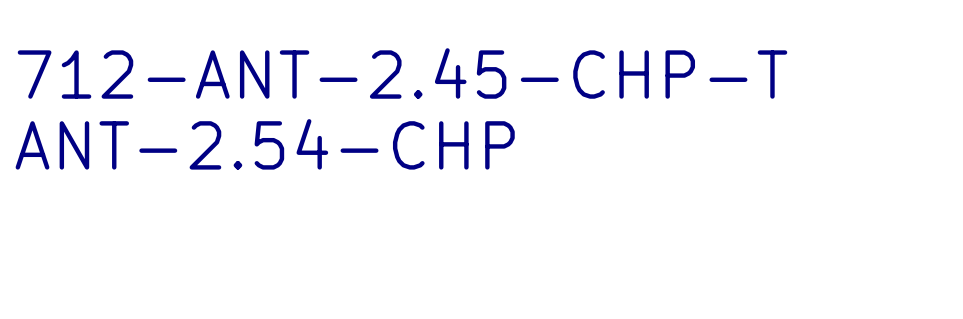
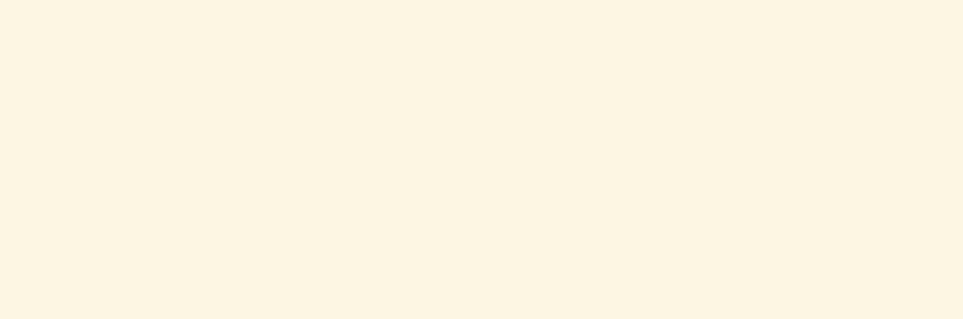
text: 712-ANT-2.45-CHP-T (402, 73) -> none
text: ANT-2.54-CHP (265, 144) -> none

